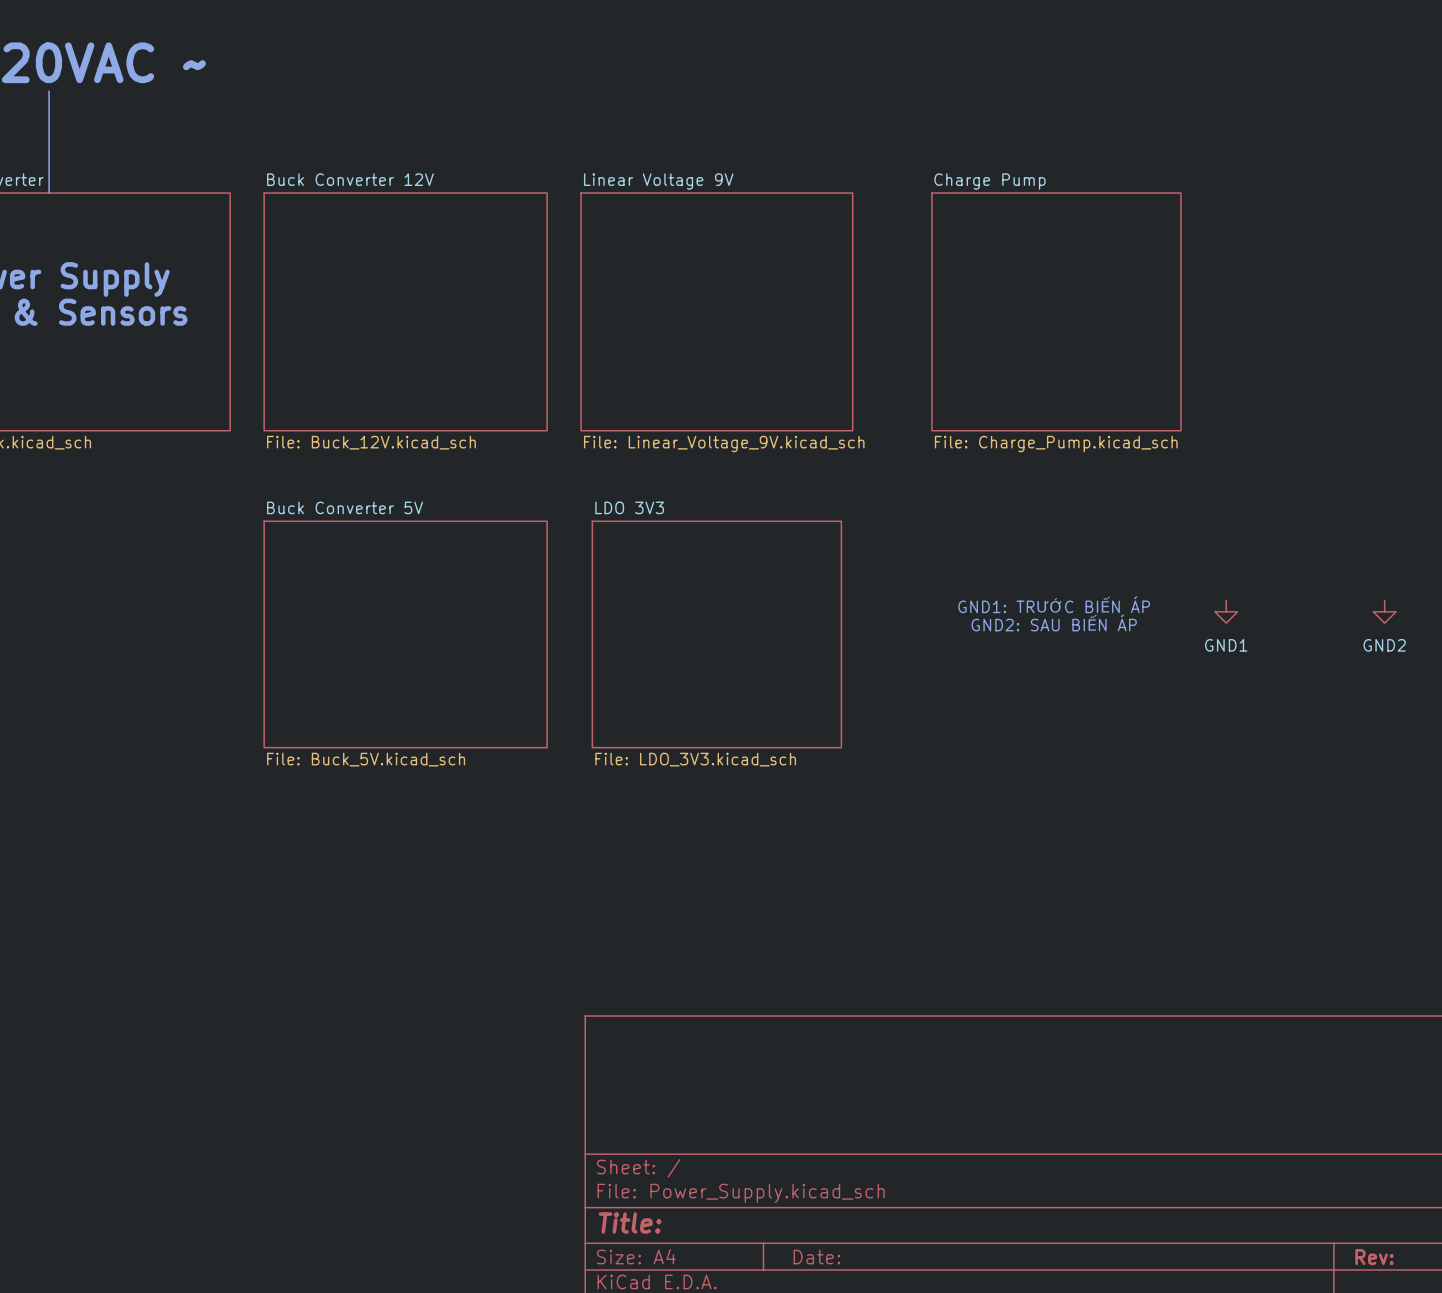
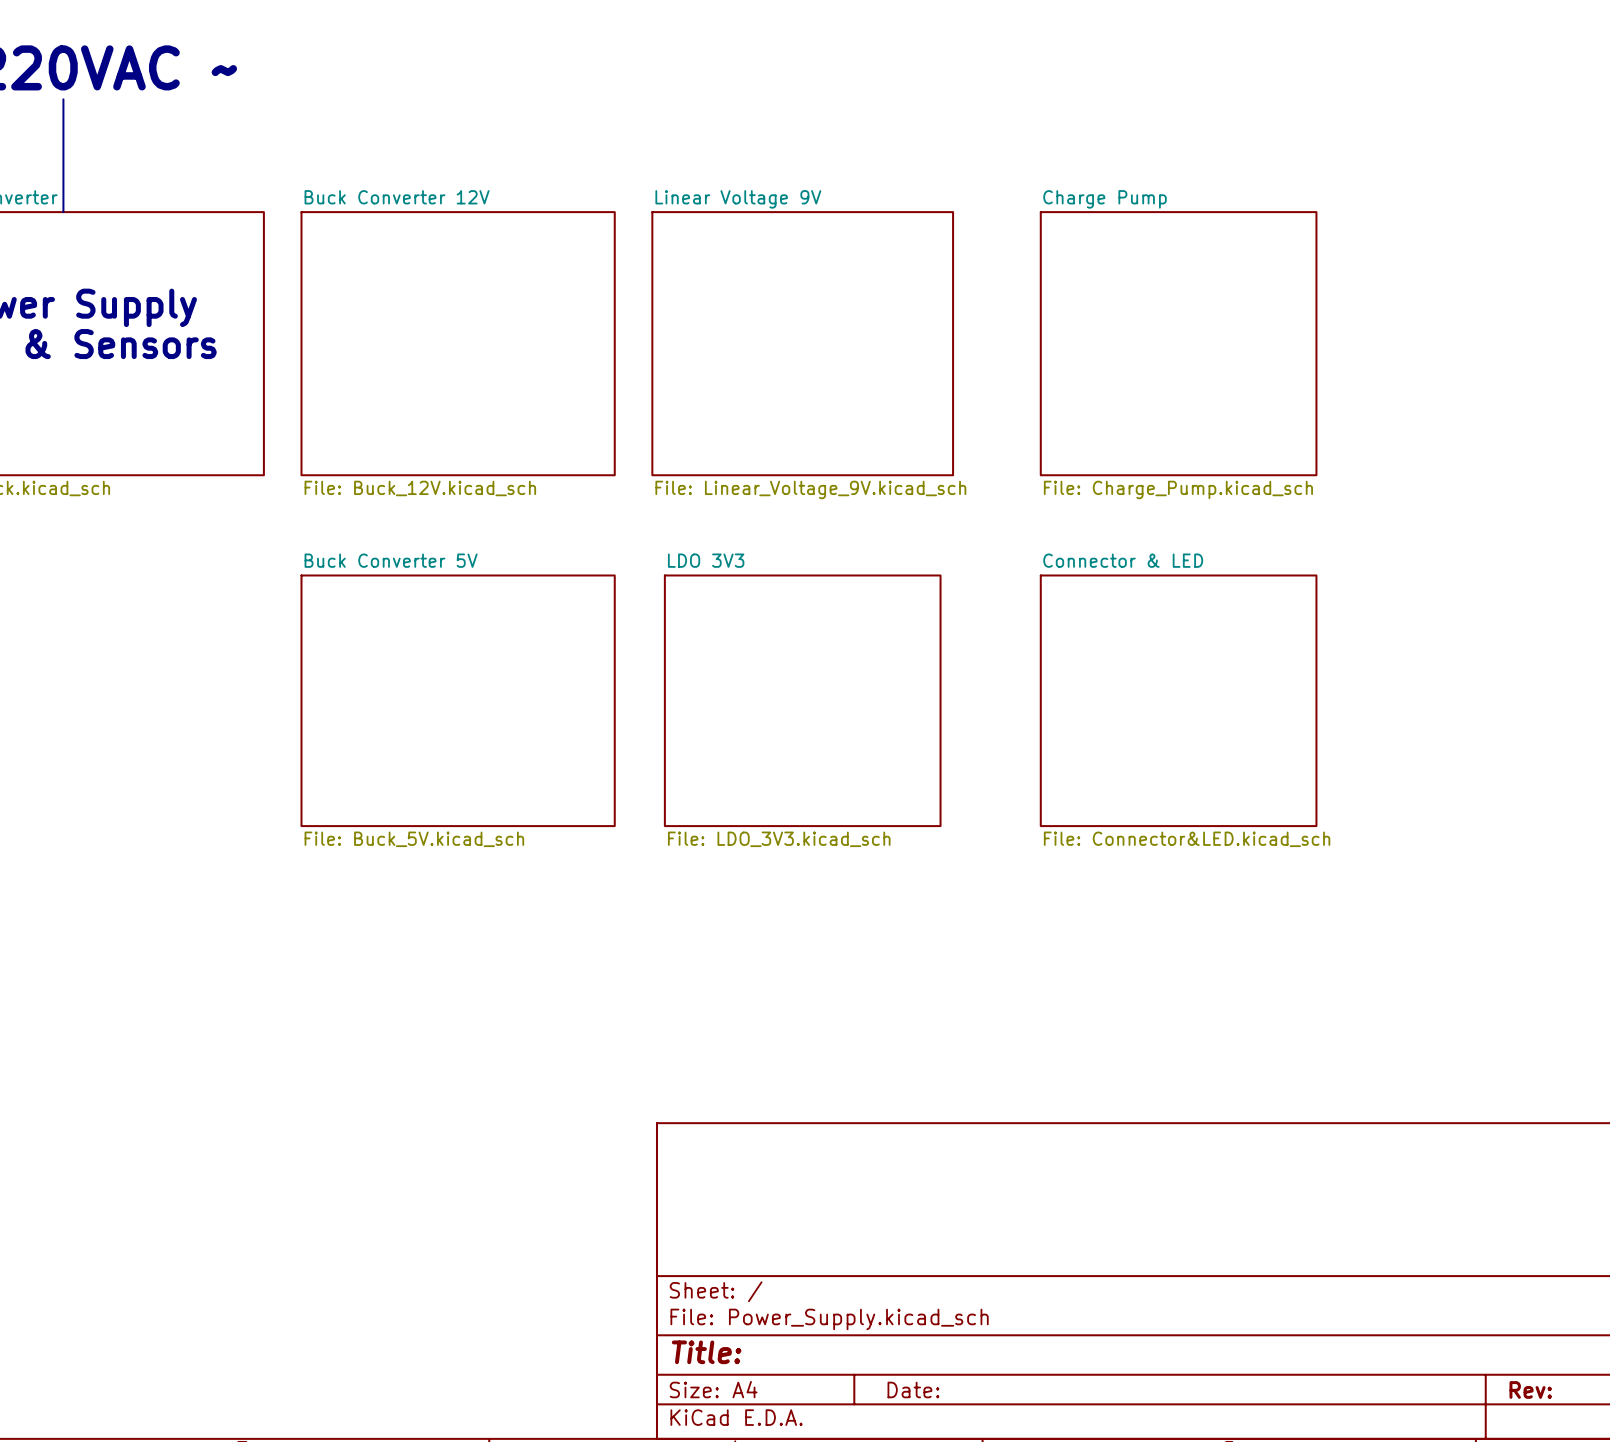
text: GND1: TRƯỚC BIẾN ÁP (1054, 604) -> none
power symbol: GND1 (1226, 611) -> none
power symbol: GND2 (1384, 611) -> none
text: GND2: SAU BIẾN ÁP (1054, 622) -> none
sheet Connector & LED: none -> File: Connector&LED.kicad_sch (1178, 700)

